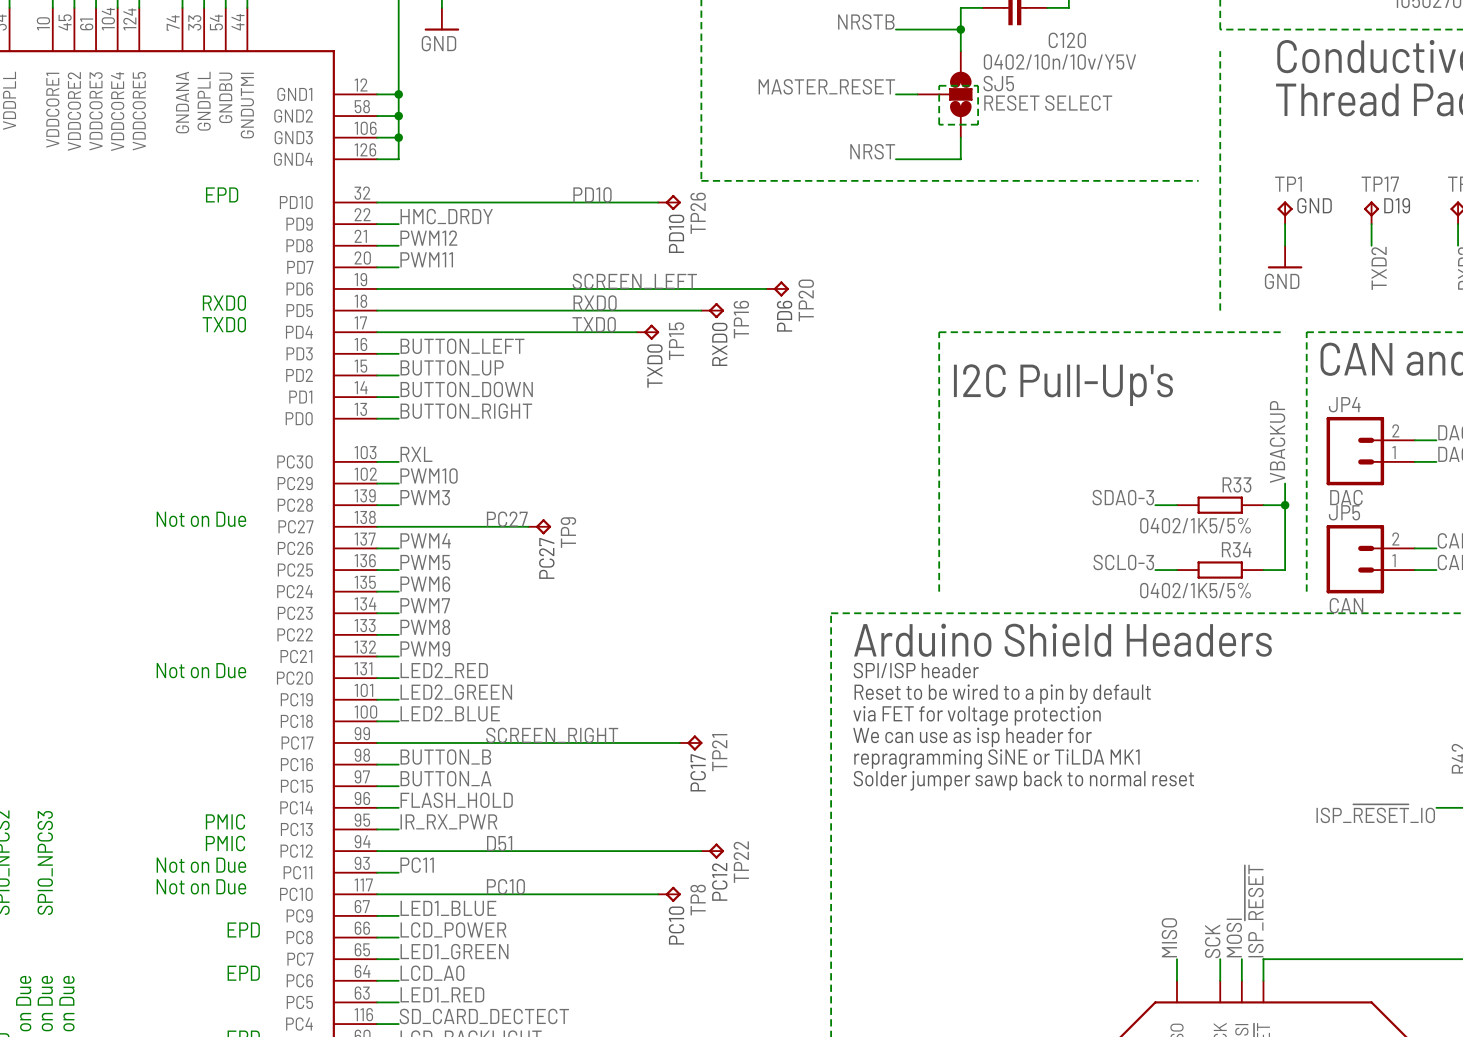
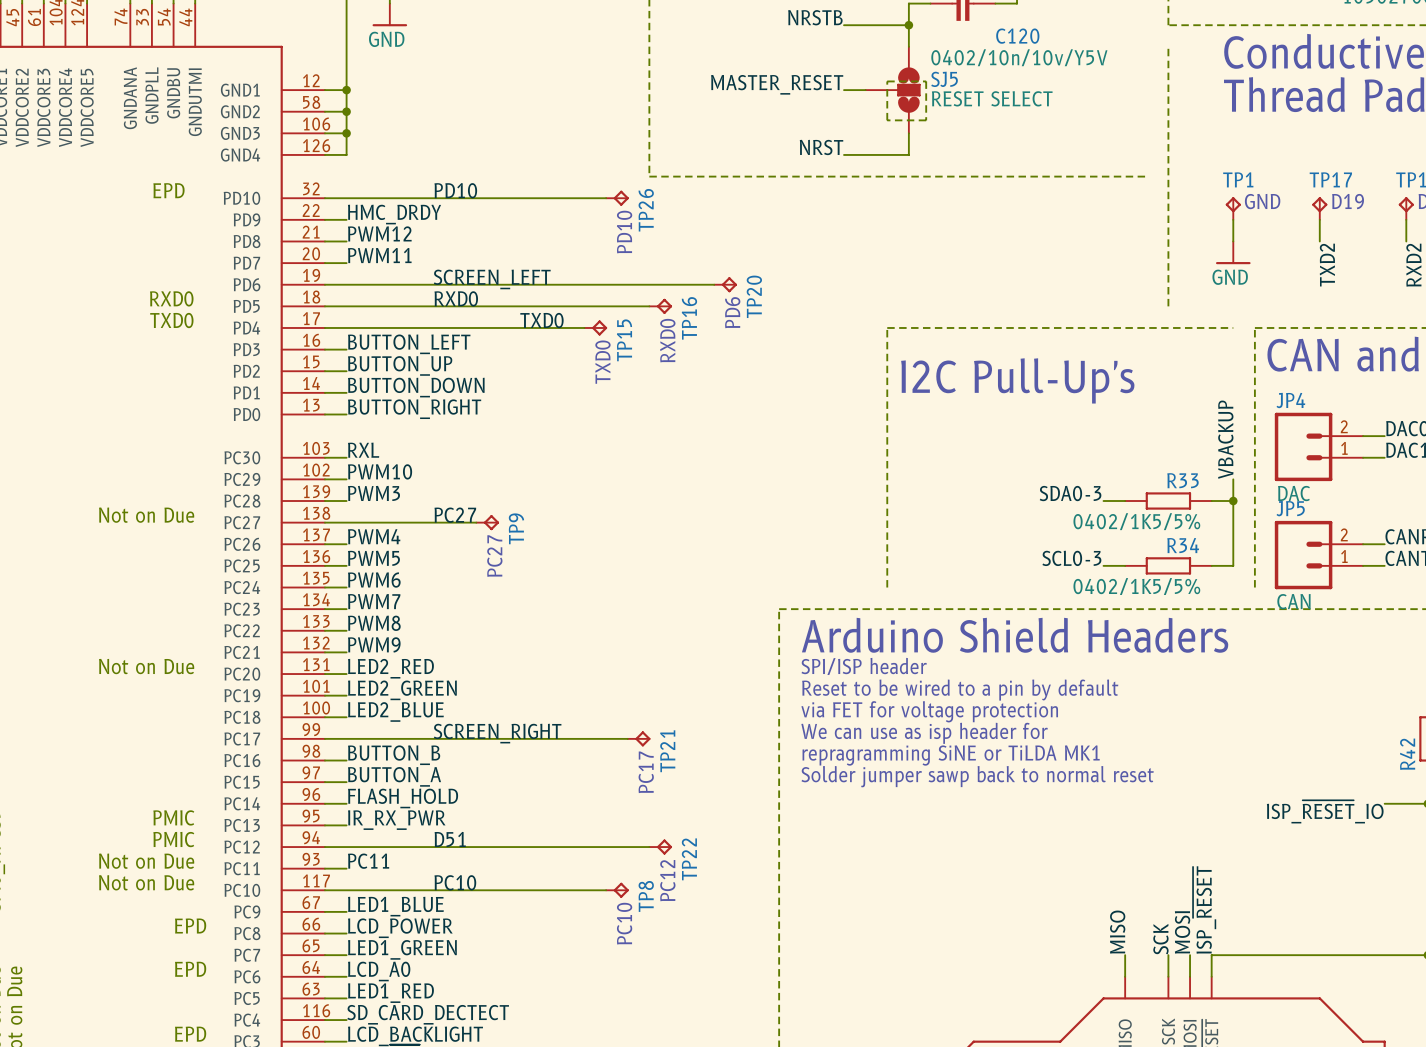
label position: PD10 (592, 194) -> PD10 (455, 190)
label position: SCREEN_LEFT (634, 281) -> SCREEN_LEFT (492, 279)
label position: RXD0 (595, 303) -> RXD0 (456, 298)

